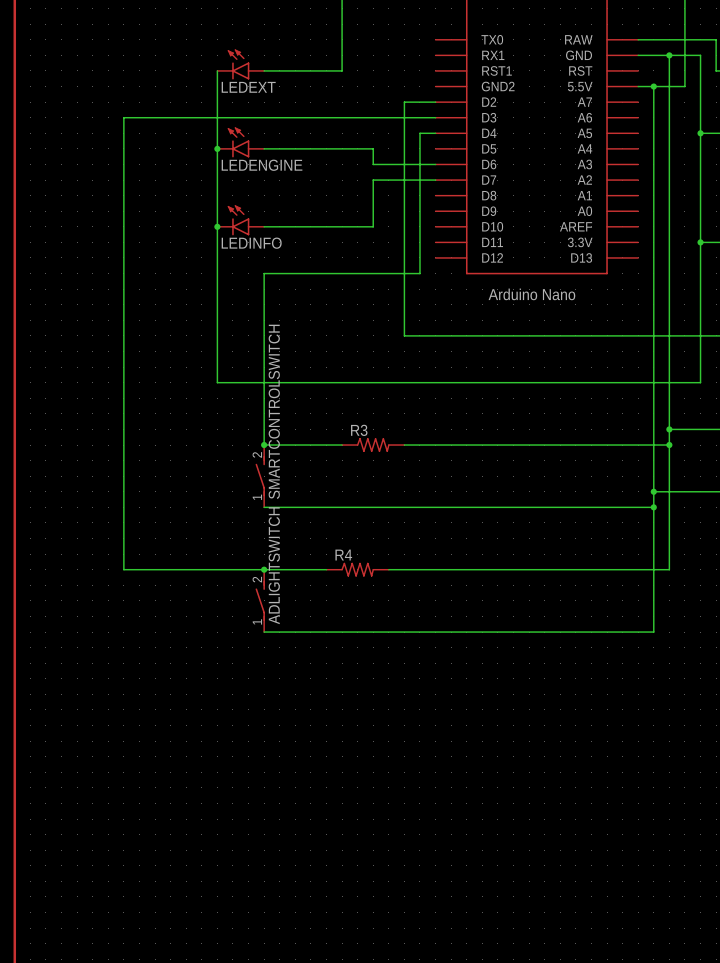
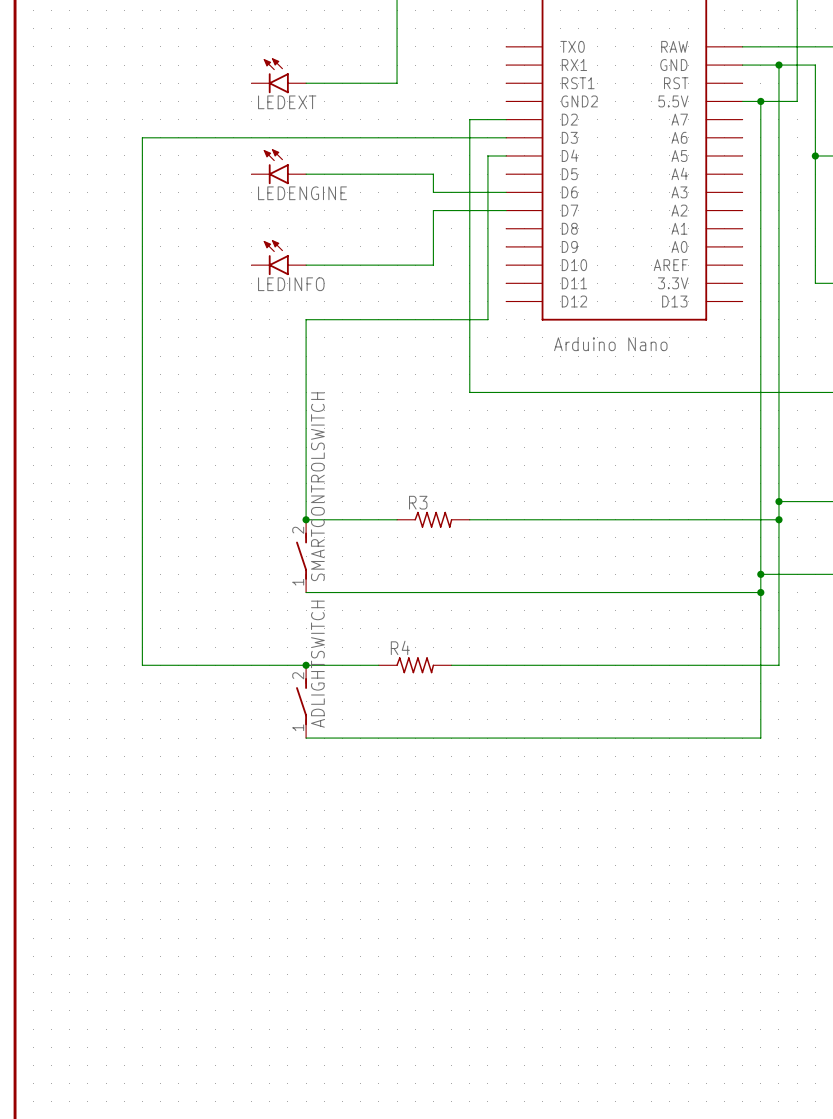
wire: (217, 70) (217, 382) (700, 382) (700, 242) -> none
junction: (217, 148) -> none
junction: (217, 226) -> none
junction: (700, 242) -> none

